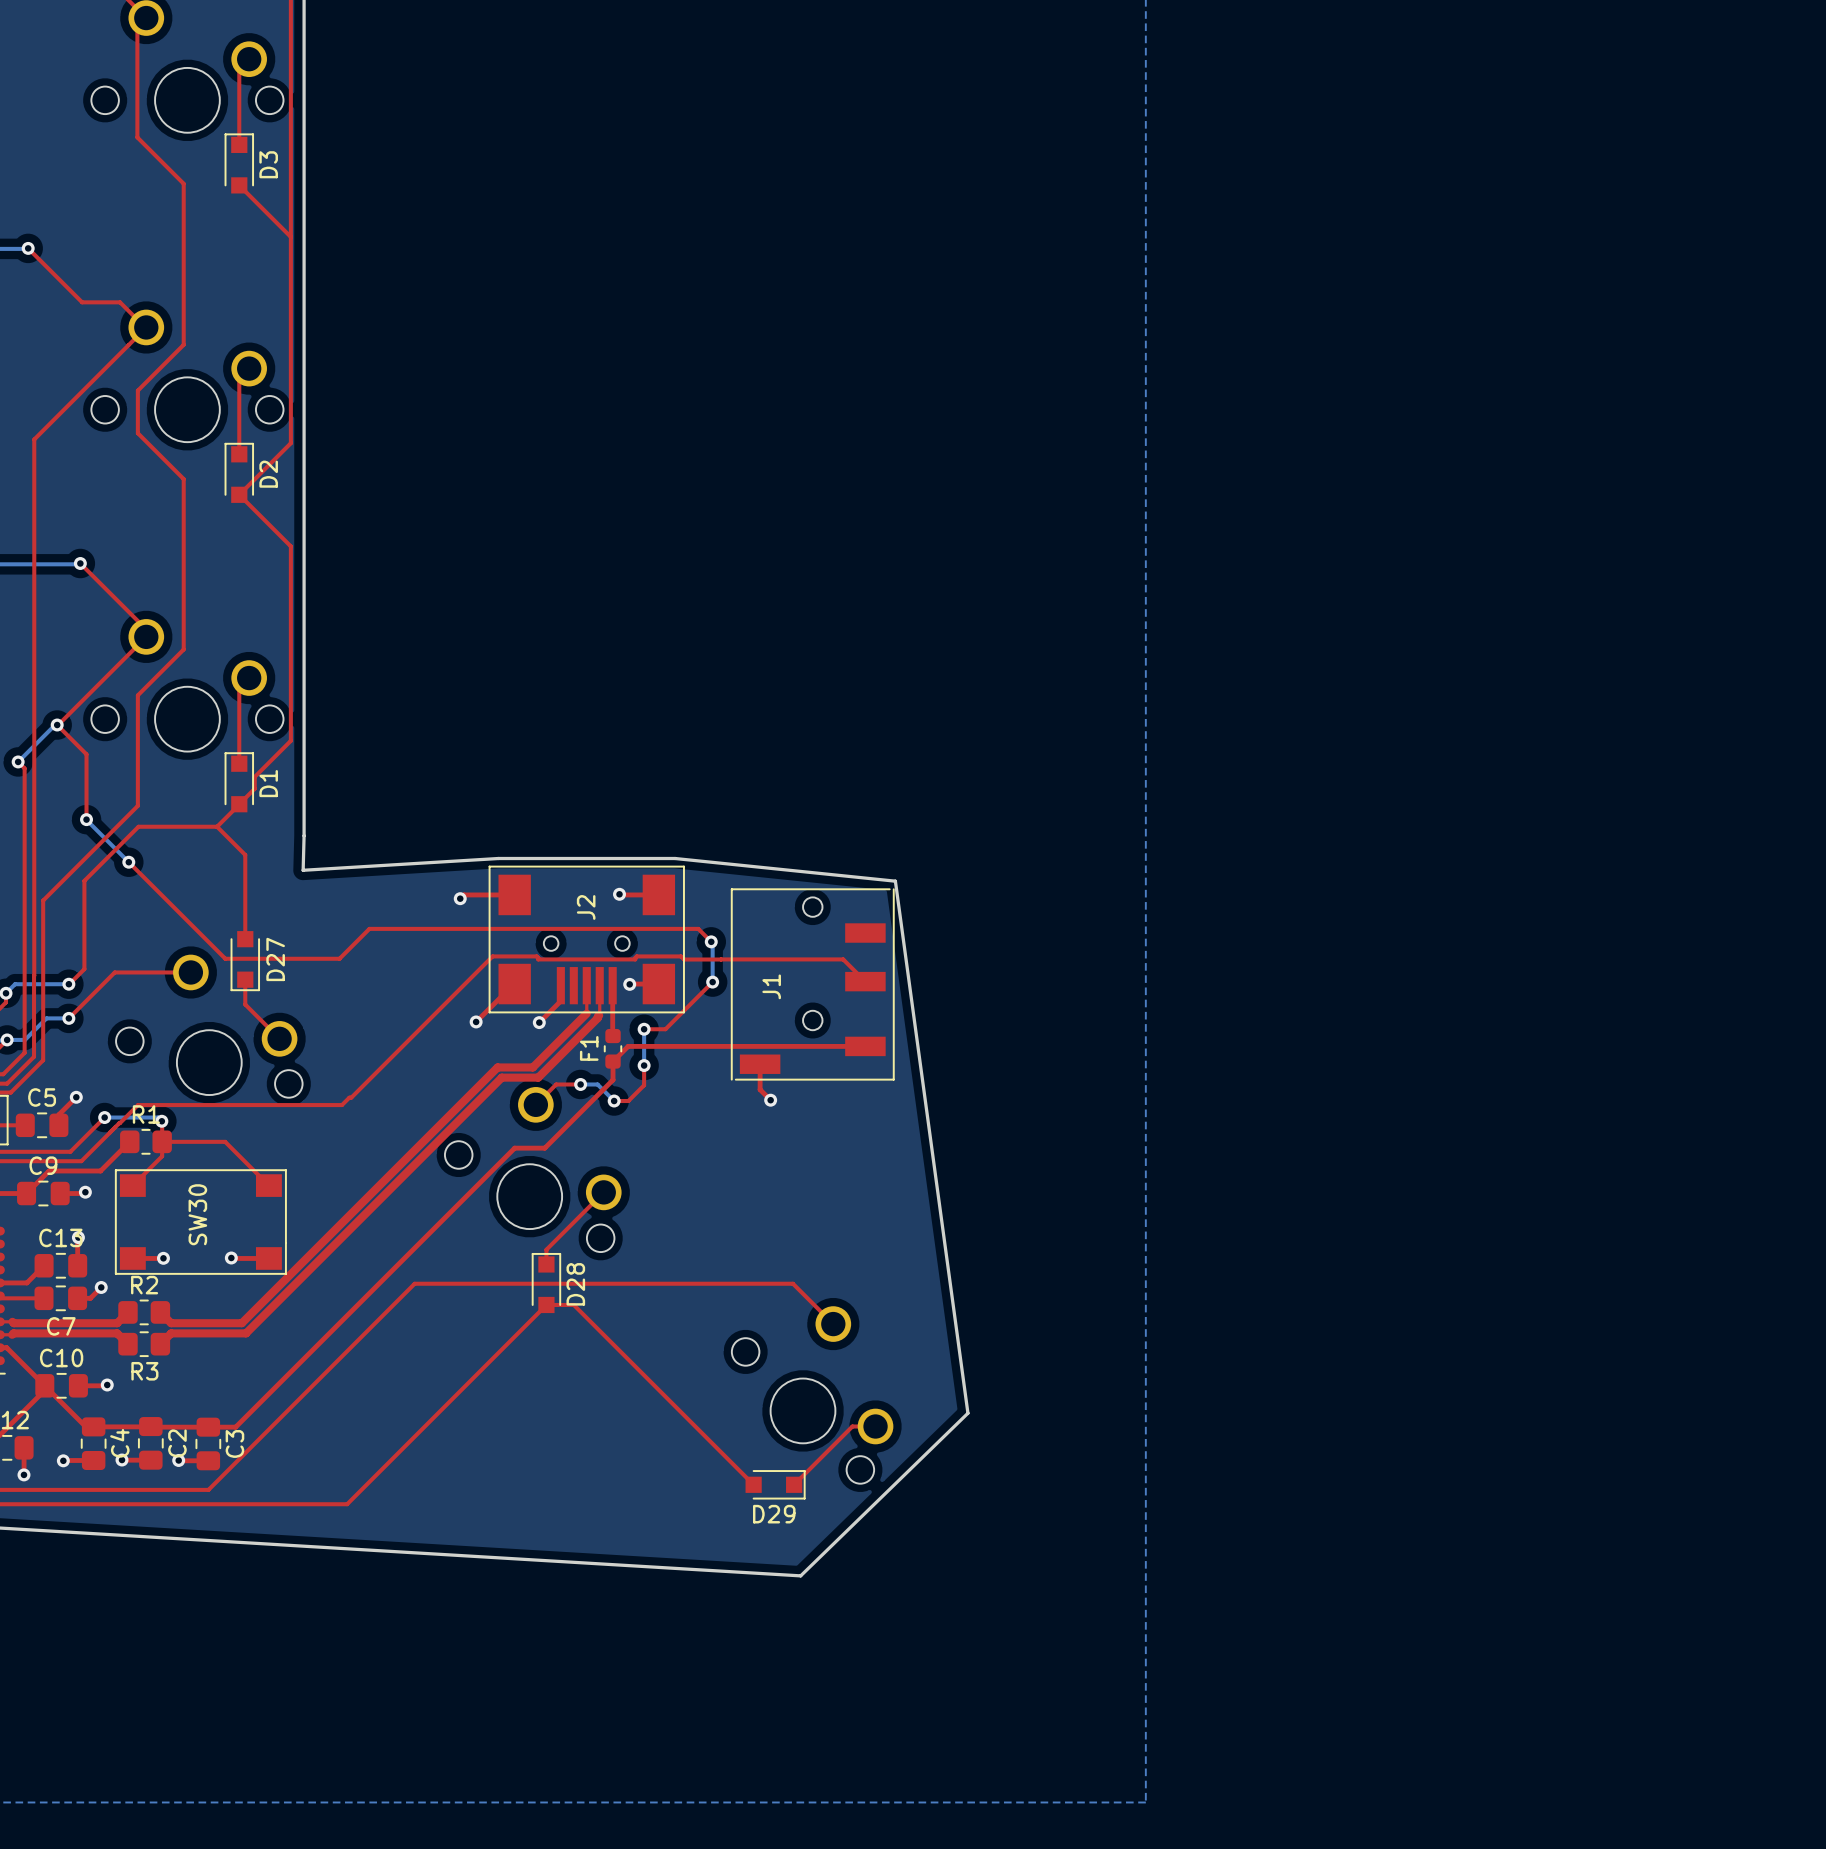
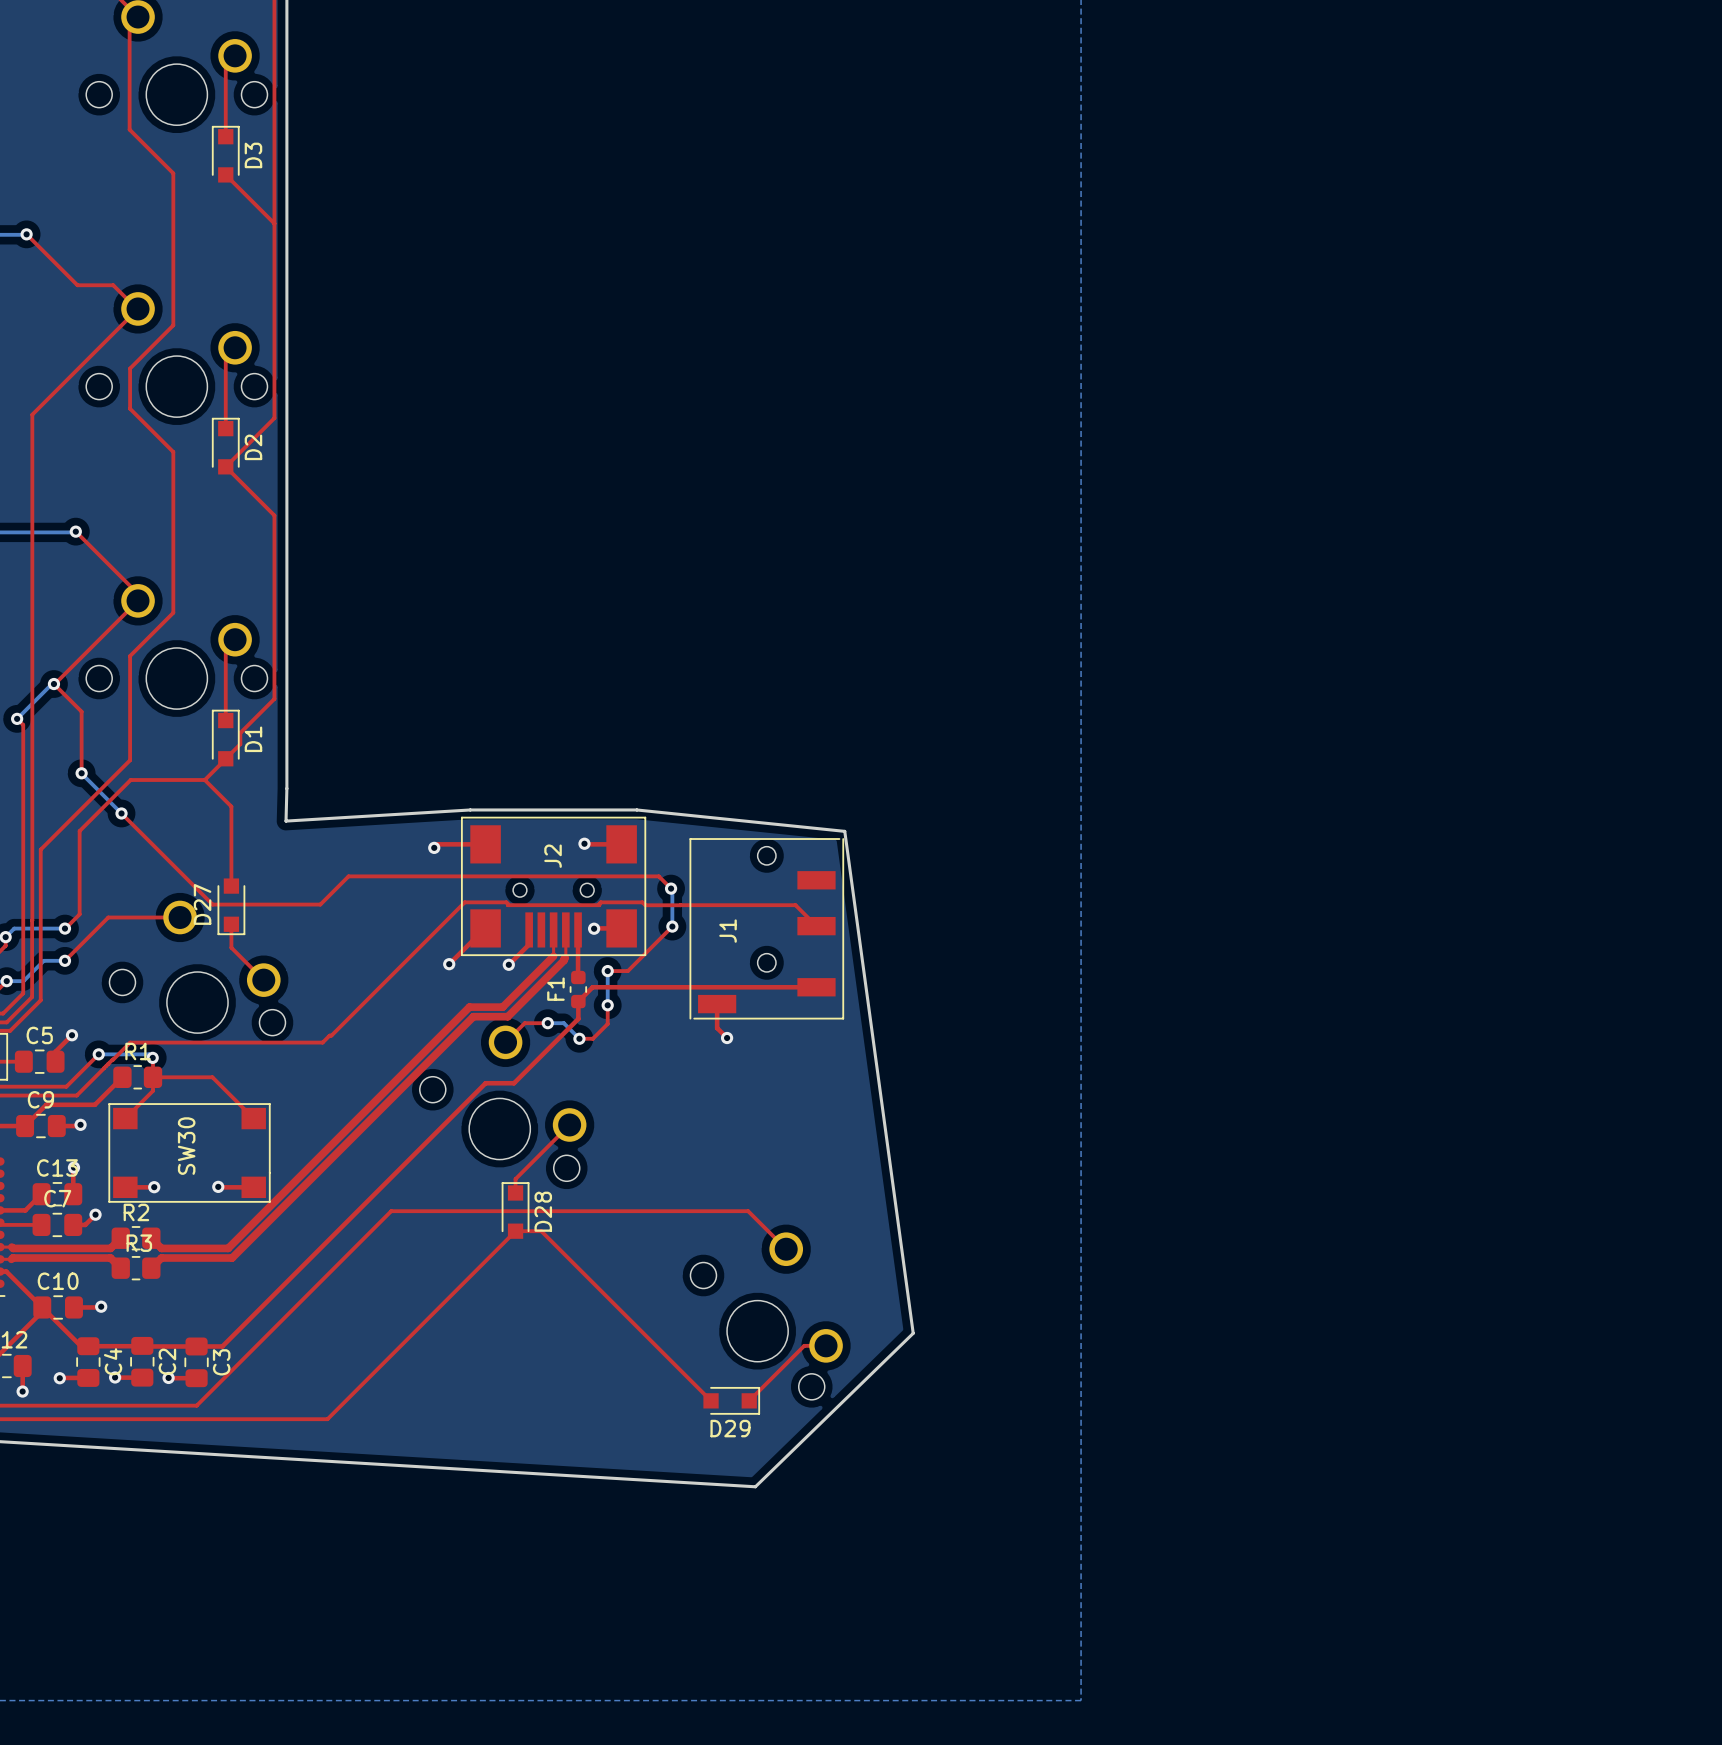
D27 name position: D27 (275, 959) -> D27 (202, 904)
C7 name position: C7 (61, 1326) -> C7 (57, 1198)
R3 name position: R3 (144, 1371) -> R3 (139, 1243)

